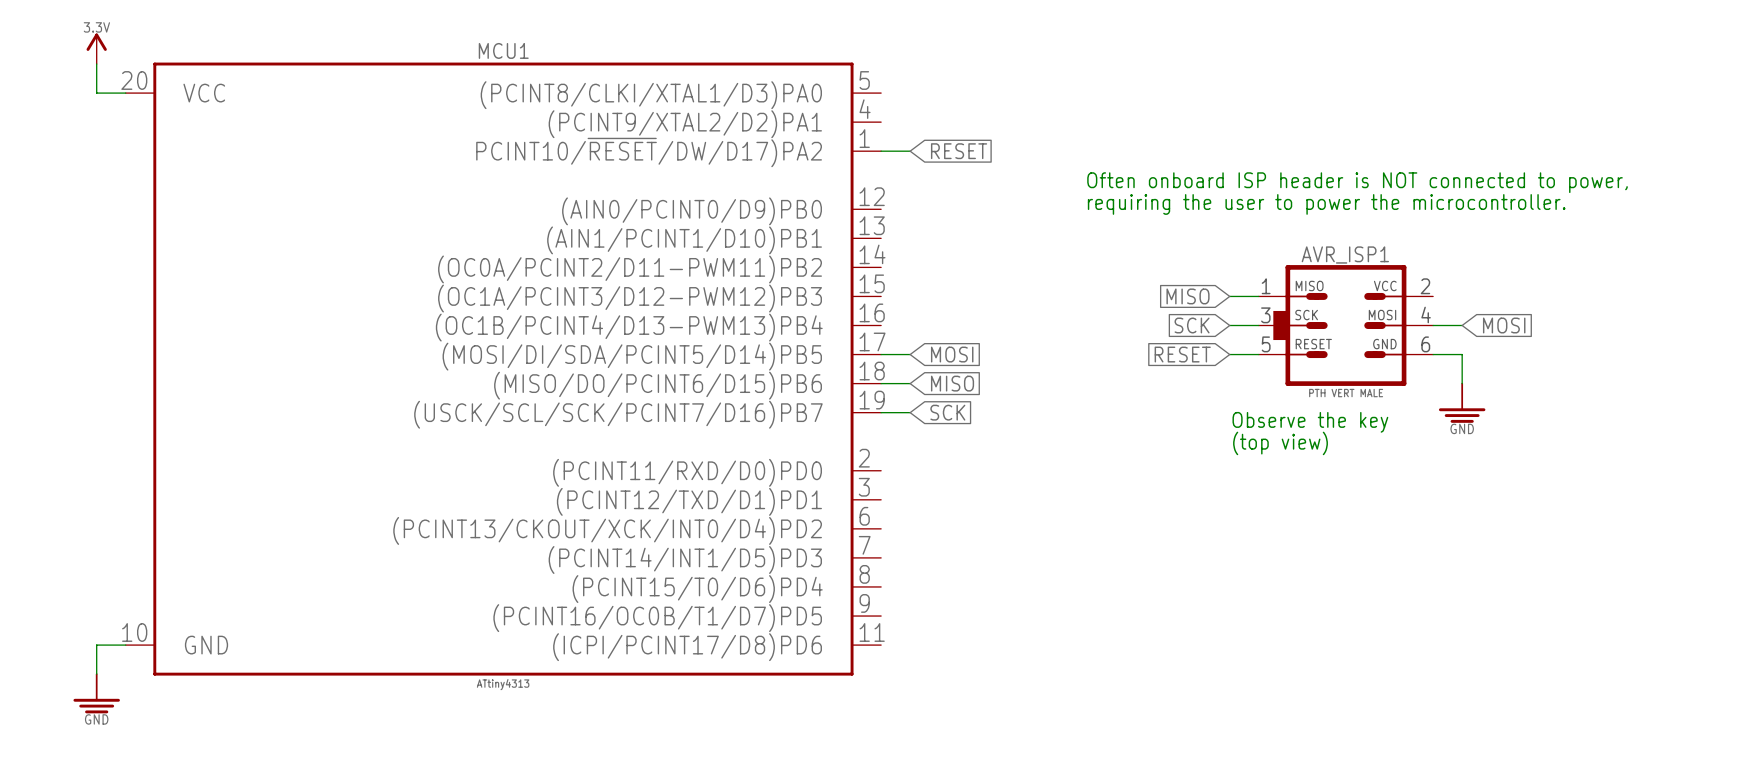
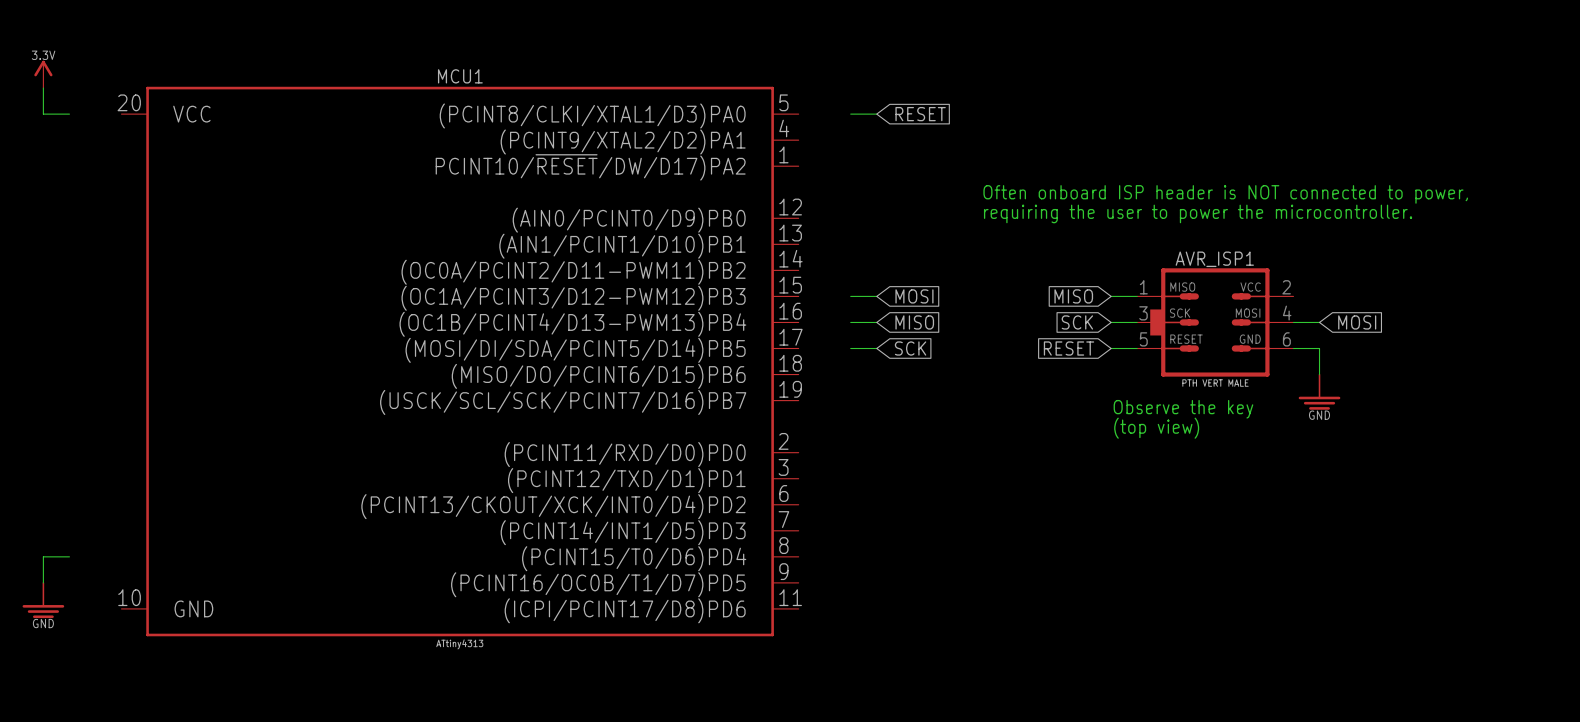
power symbol position: (96, 48) -> (43, 74)
wire: (96, 64) (96, 93) (125, 93) -> (43, 88) (43, 114) (69, 114)
wire: (881, 151) (910, 151) -> (850, 114) (876, 114)
global label position: RESET (959, 151) -> RESET (920, 114)
wire: (881, 354) (910, 354) -> (850, 296) (876, 296)
global label position: MOSI (952, 354) -> MOSI (914, 296)
wire: (881, 383) (910, 383) -> (850, 322) (876, 322)
global label position: MISO (952, 383) -> MISO (914, 322)
wire: (881, 412) (910, 412) -> (850, 348) (876, 348)
global label position: SCK (947, 412) -> SCK (910, 348)
wire: (125, 645) (96, 645) (96, 674) -> (69, 556) (43, 556) (43, 582)
power symbol position: (96, 693) -> (43, 600)

